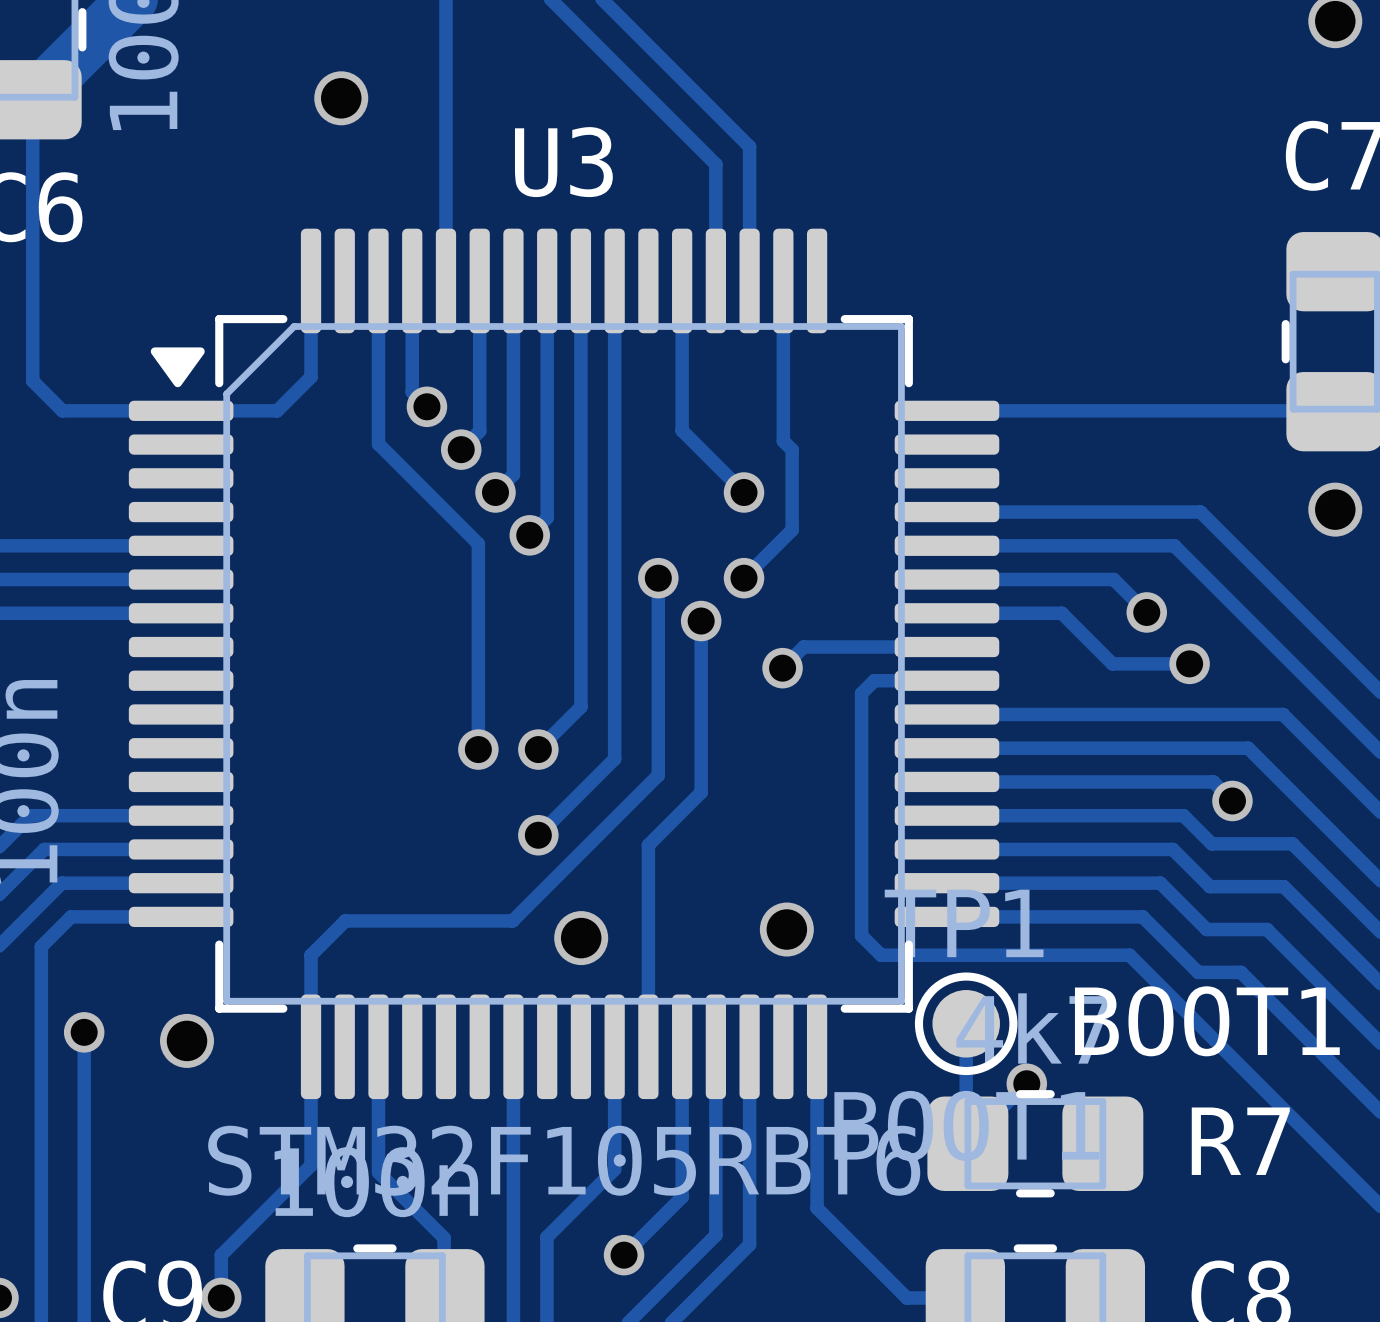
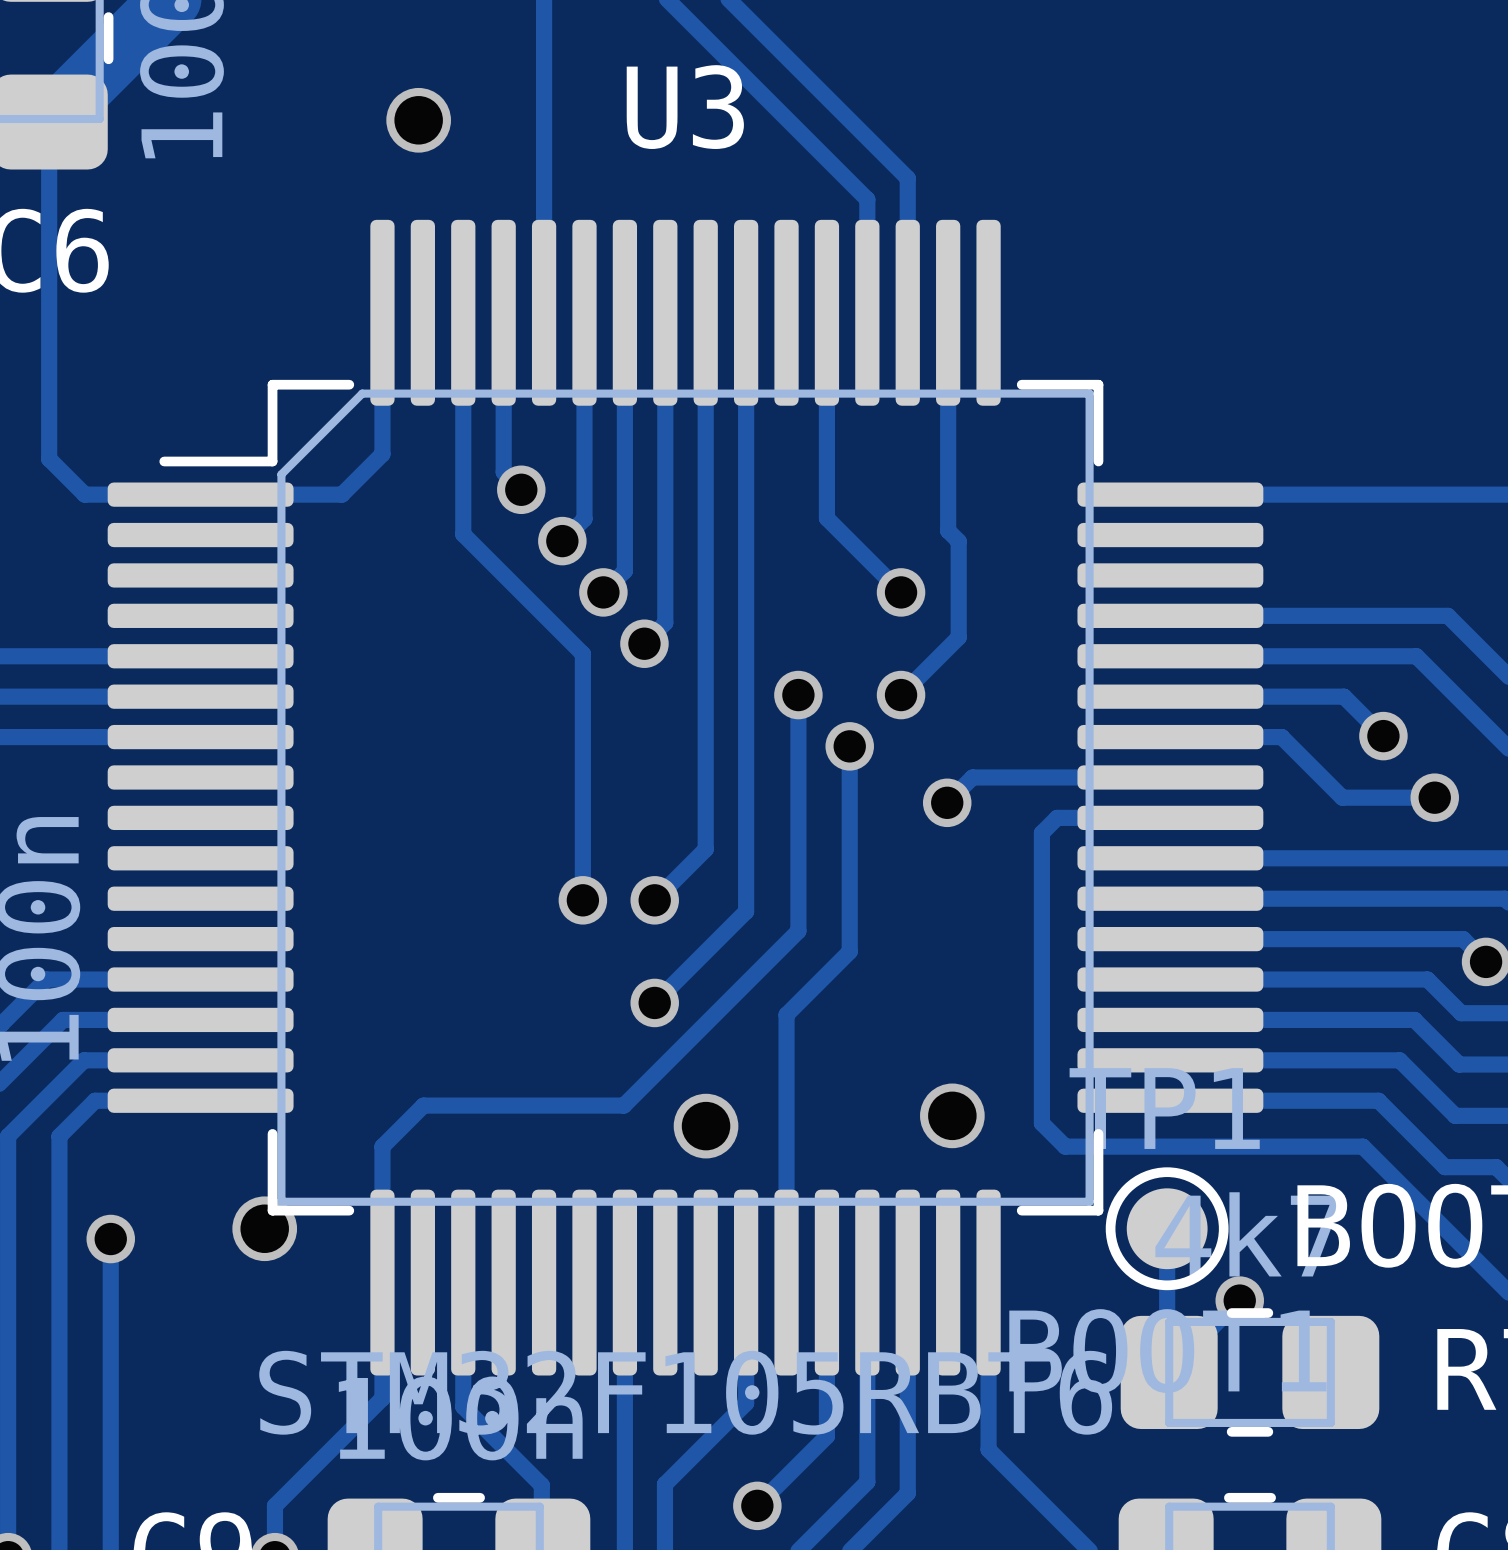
U3 name position: U3 (563, 162) -> U3 (685, 107)
U3 footprint: [128, 228, 1000, 1100] -> [107, 219, 1264, 1376]
via position: (187, 1040) -> (264, 1228)

